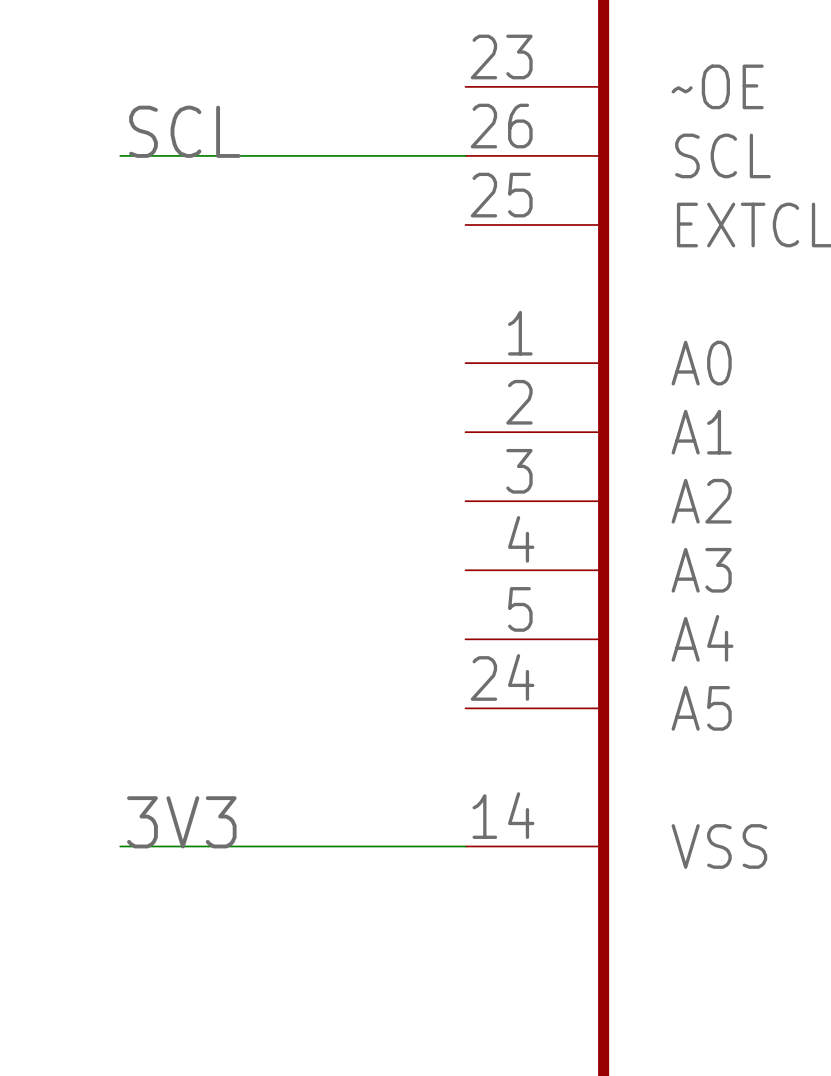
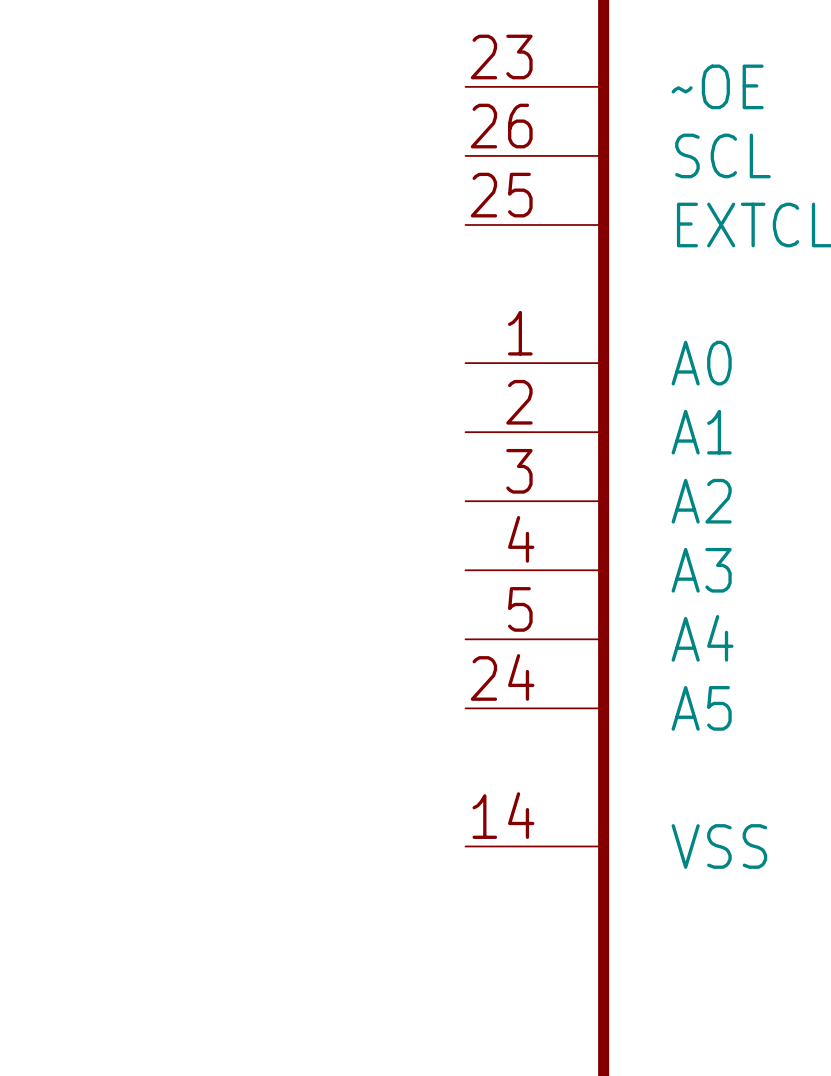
label: SCL (184, 131) -> none
wire: (120, 155) (465, 155) -> none
label: 3V3 (181, 822) -> none
wire: (120, 846) (465, 846) -> none

